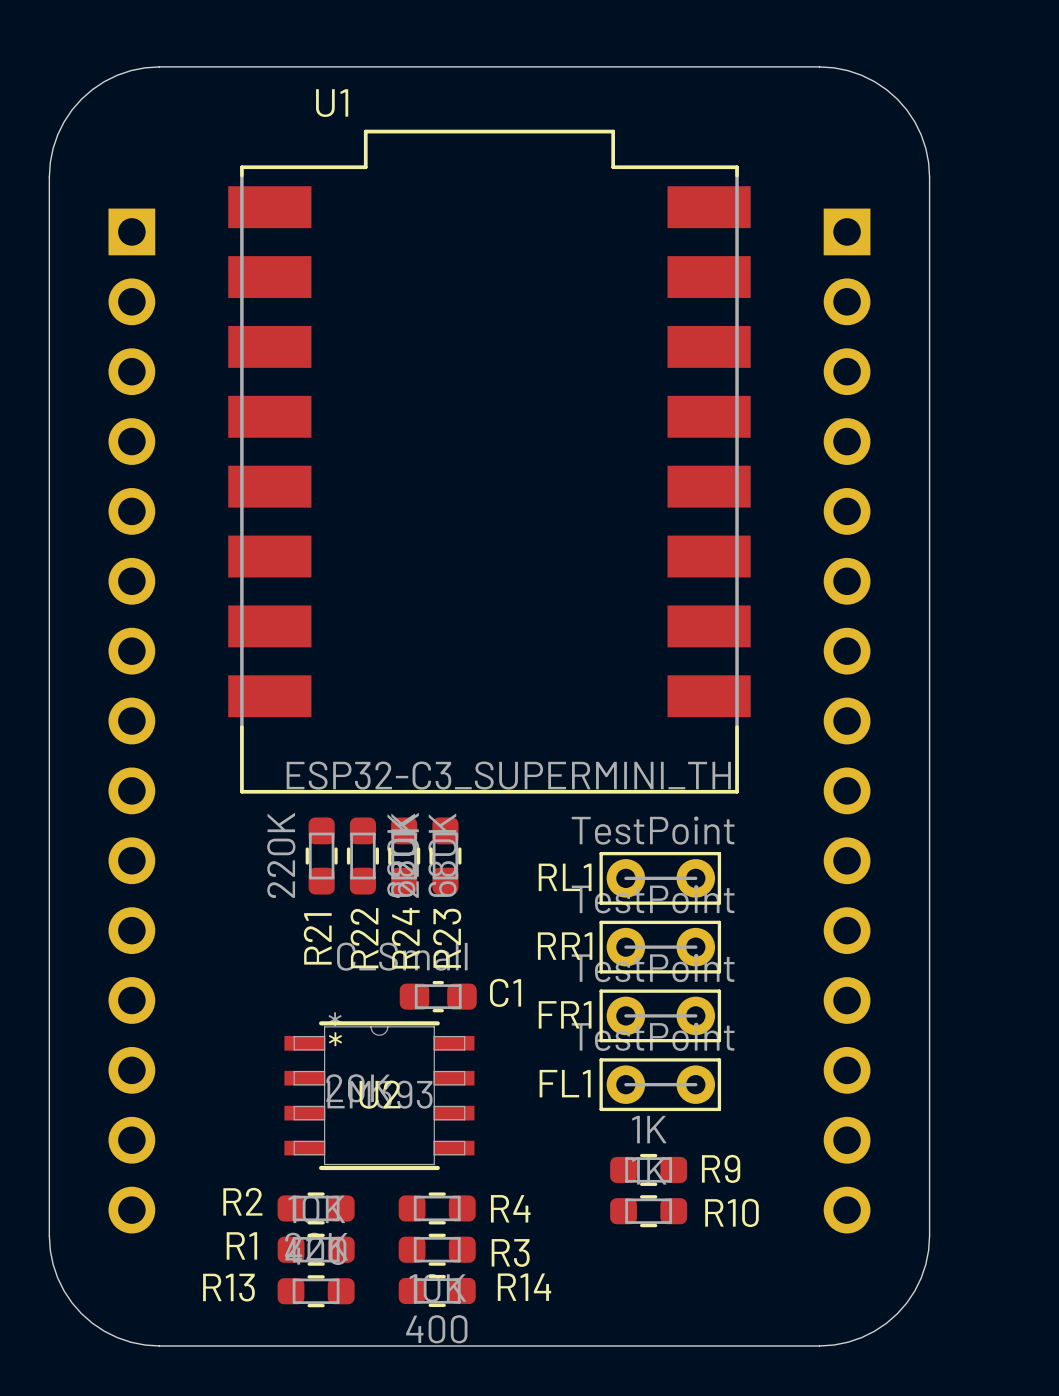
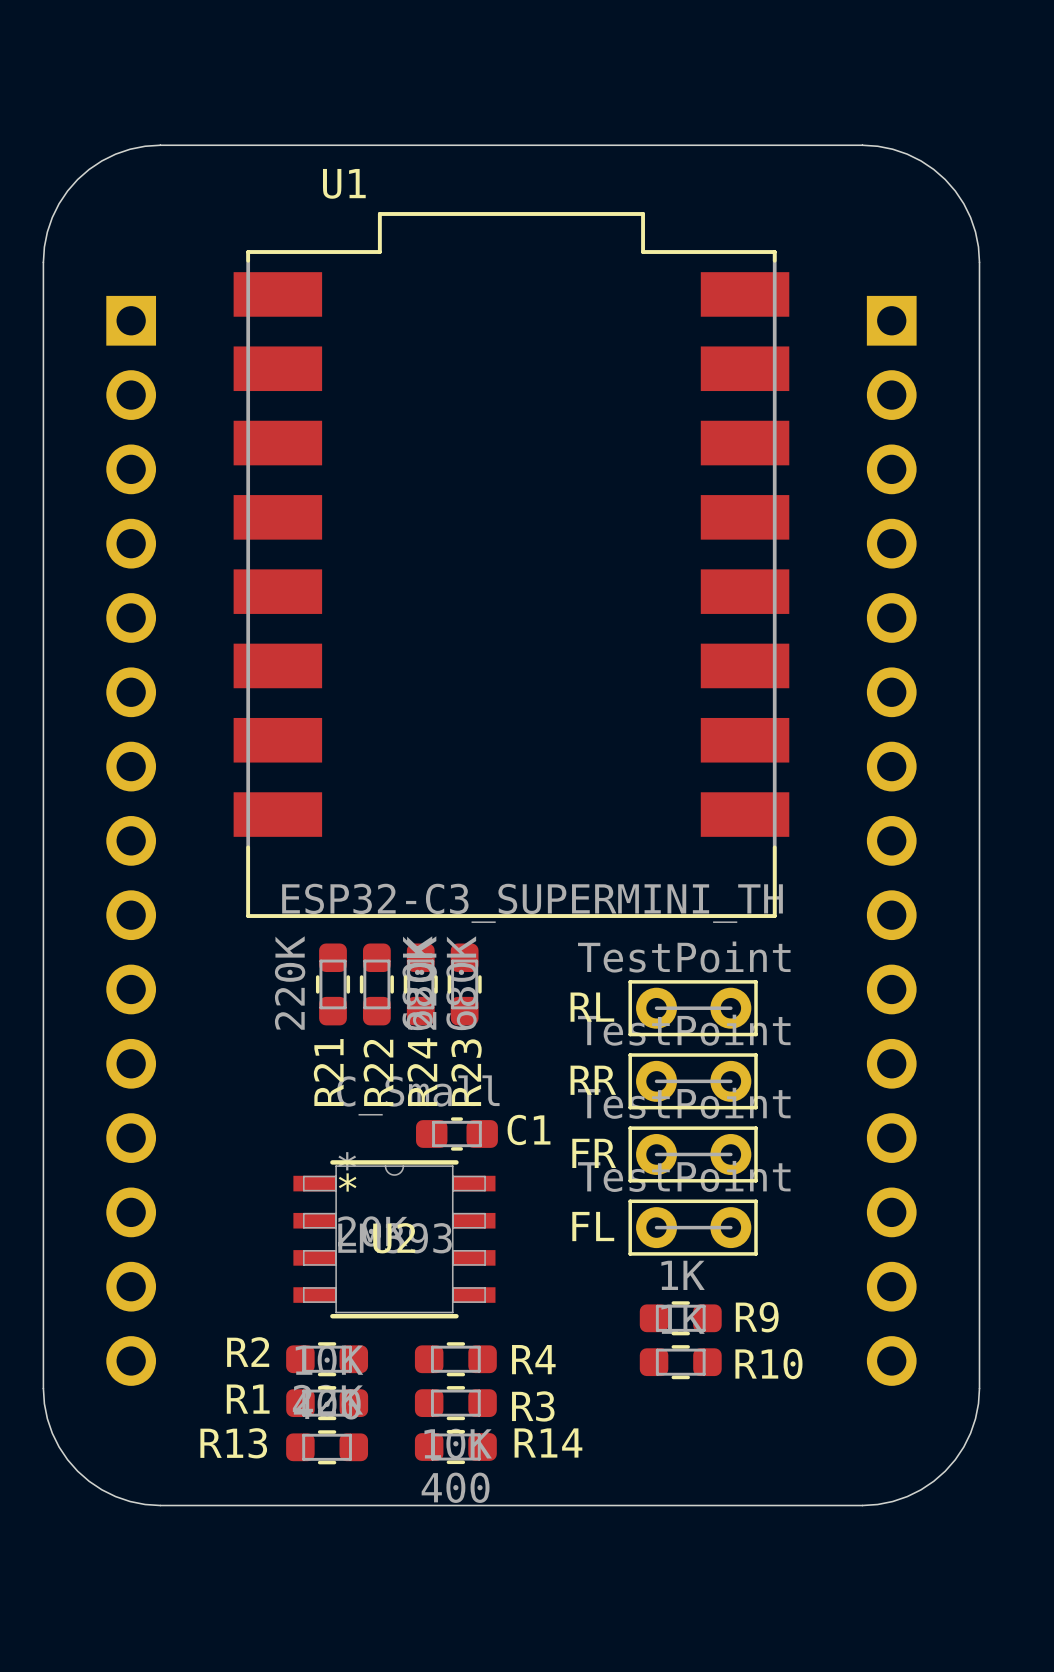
RL1 name: RL1 (565, 877) -> RL (592, 1007)
RR1 name: RR1 (565, 946) -> RR (593, 1080)
FR1 name: FR1 (565, 1014) -> FR (594, 1153)
FL1 name: FL1 (565, 1083) -> FL (593, 1226)

